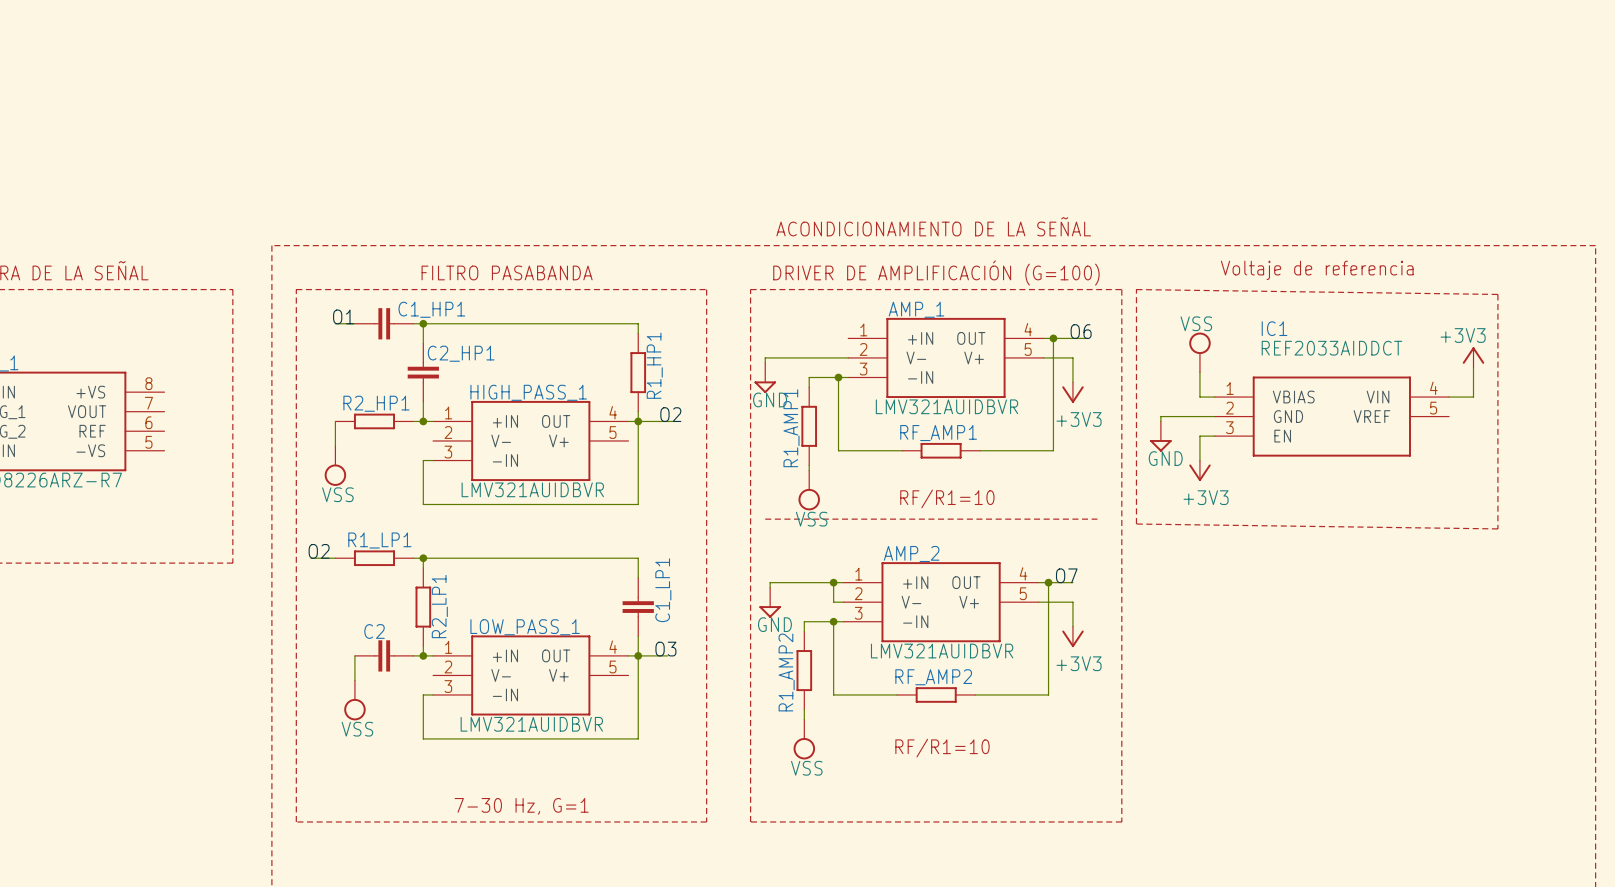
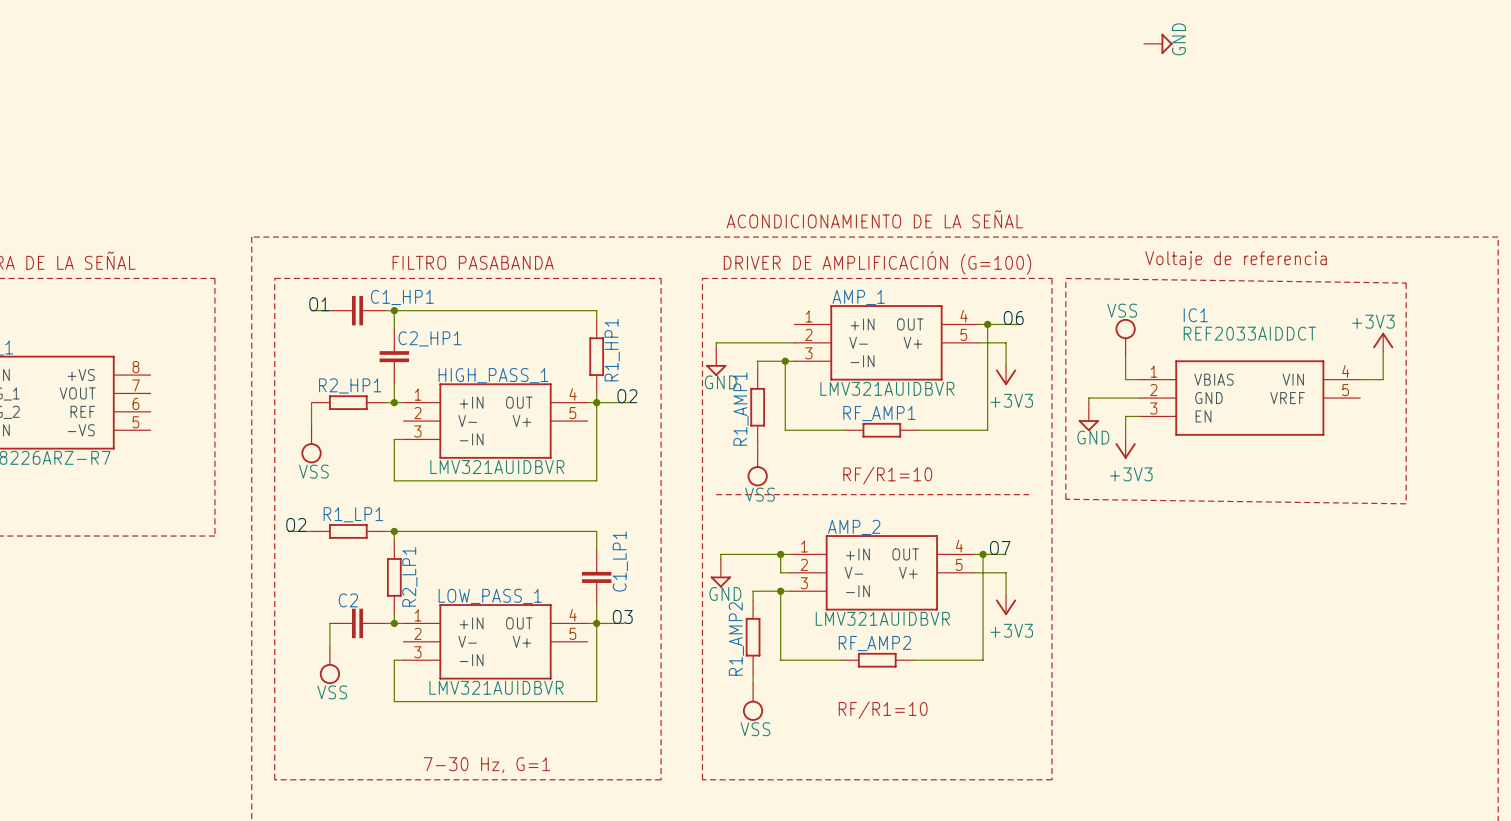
power symbol: none -> GND (1158, 43)

